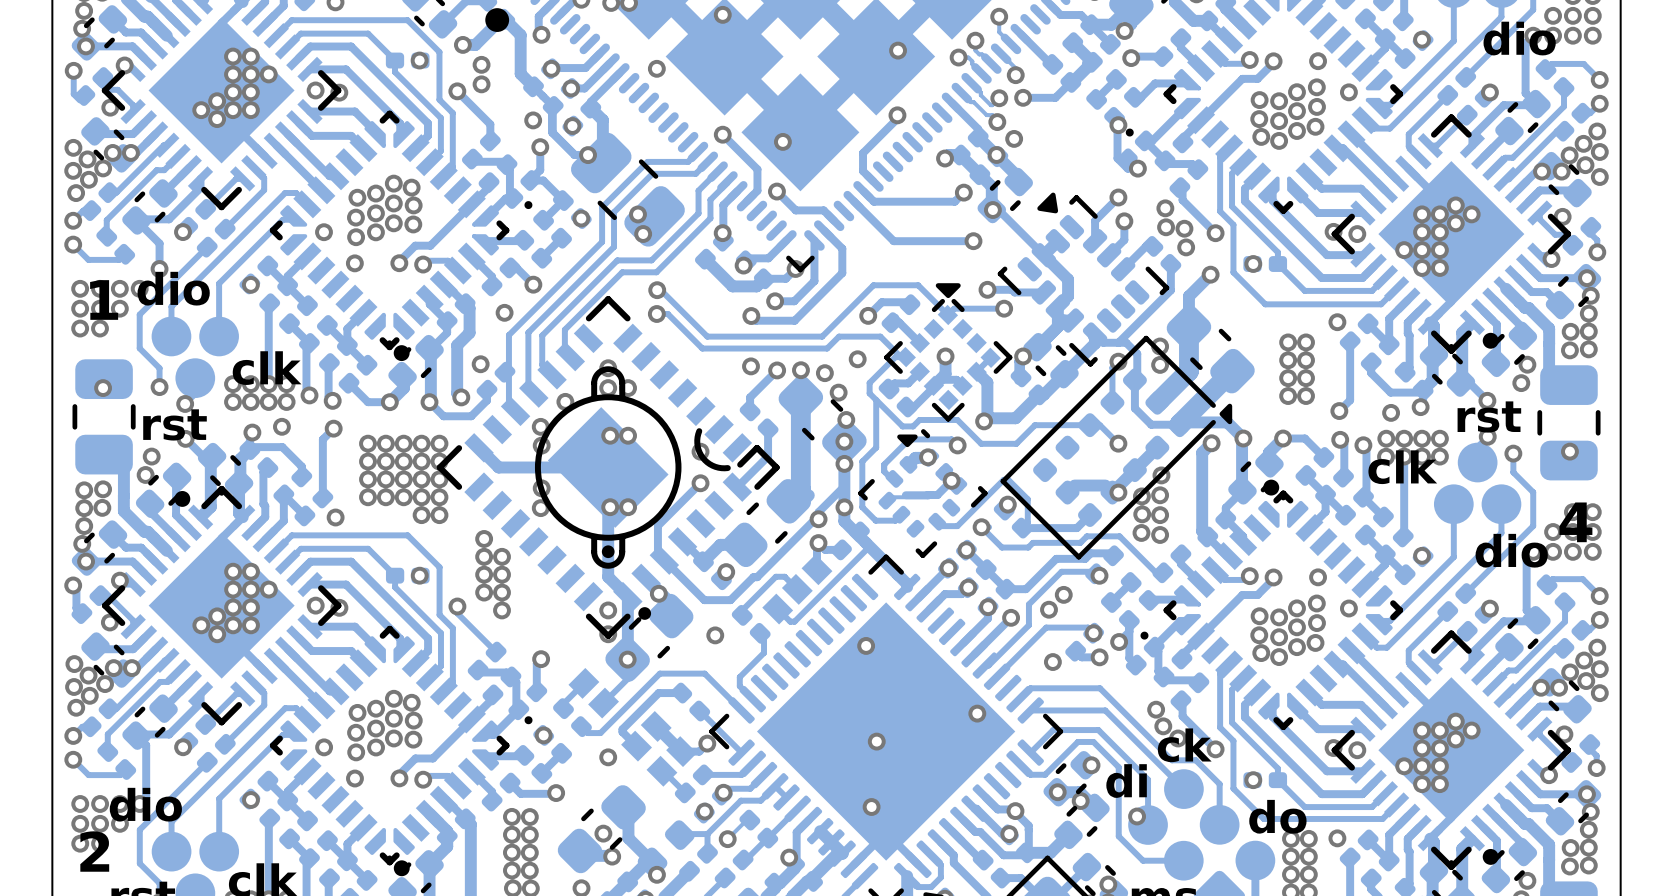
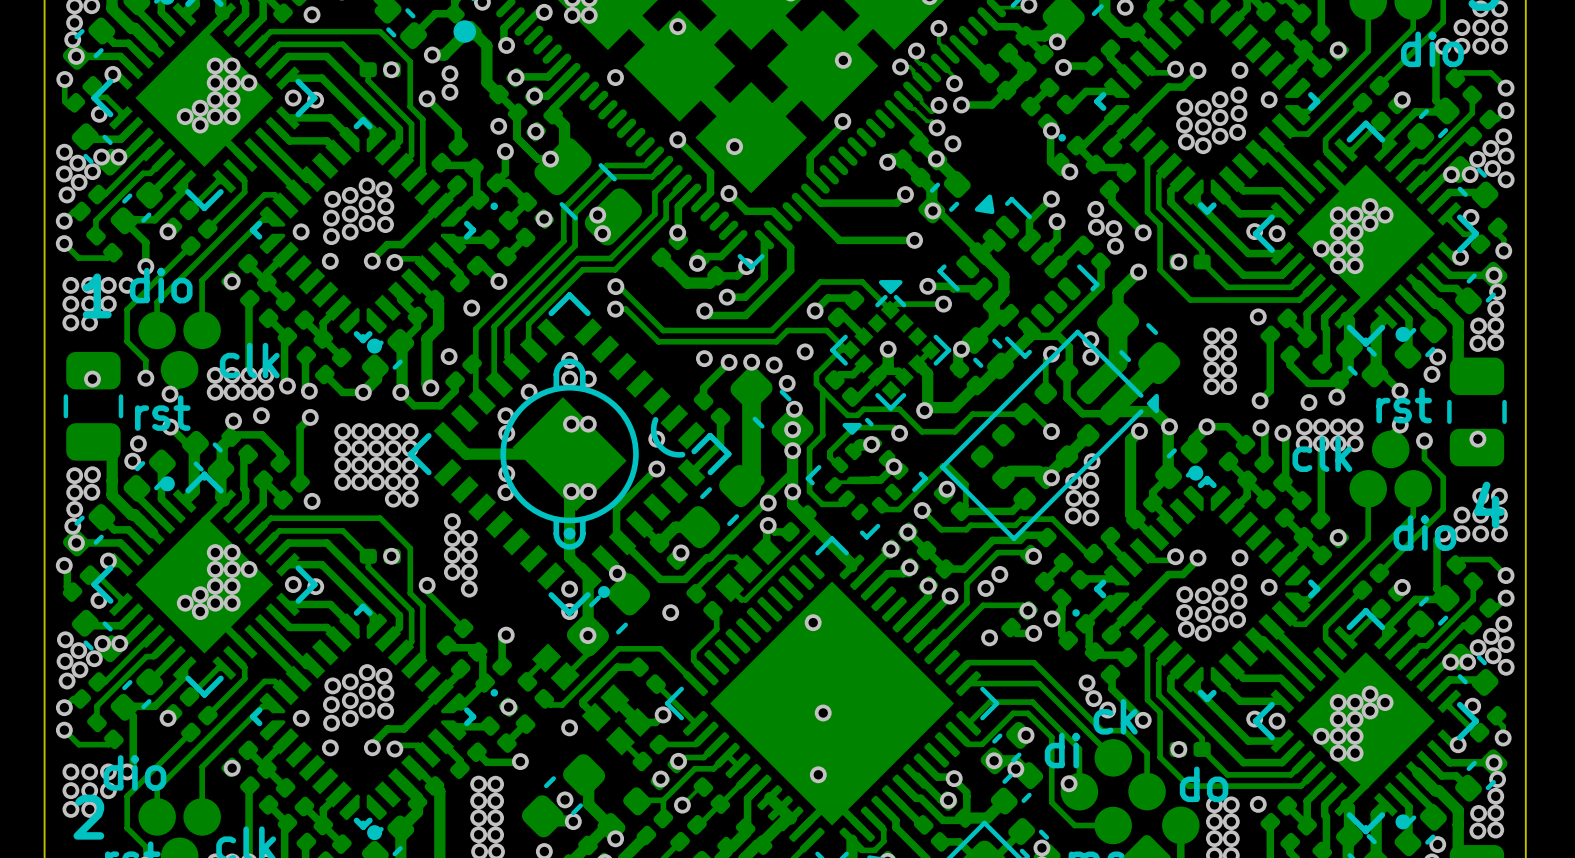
via: (977, 713) -> none
via: (789, 857) -> none

